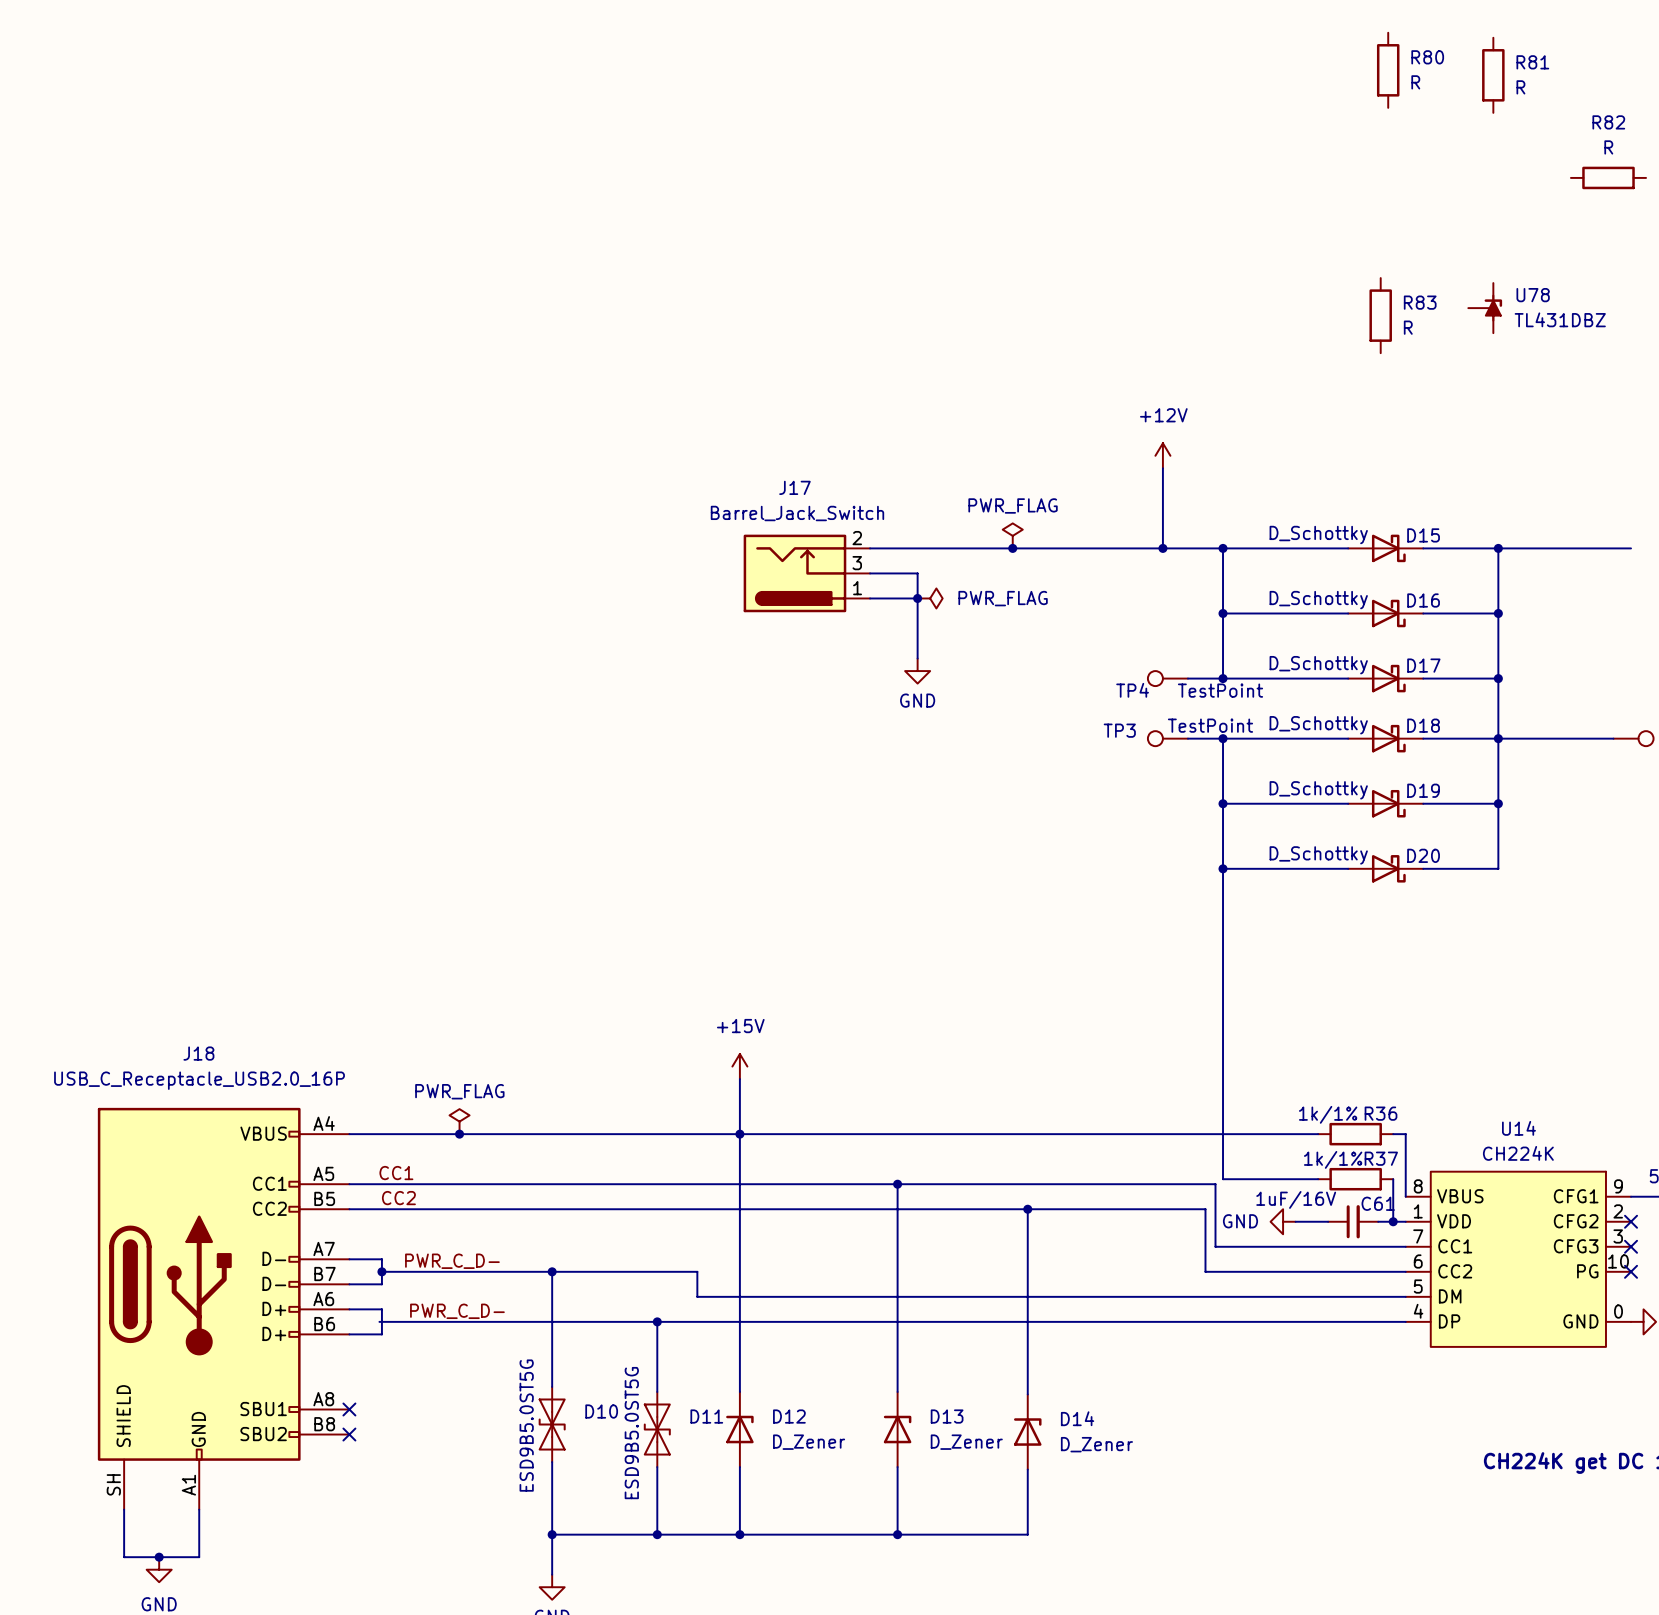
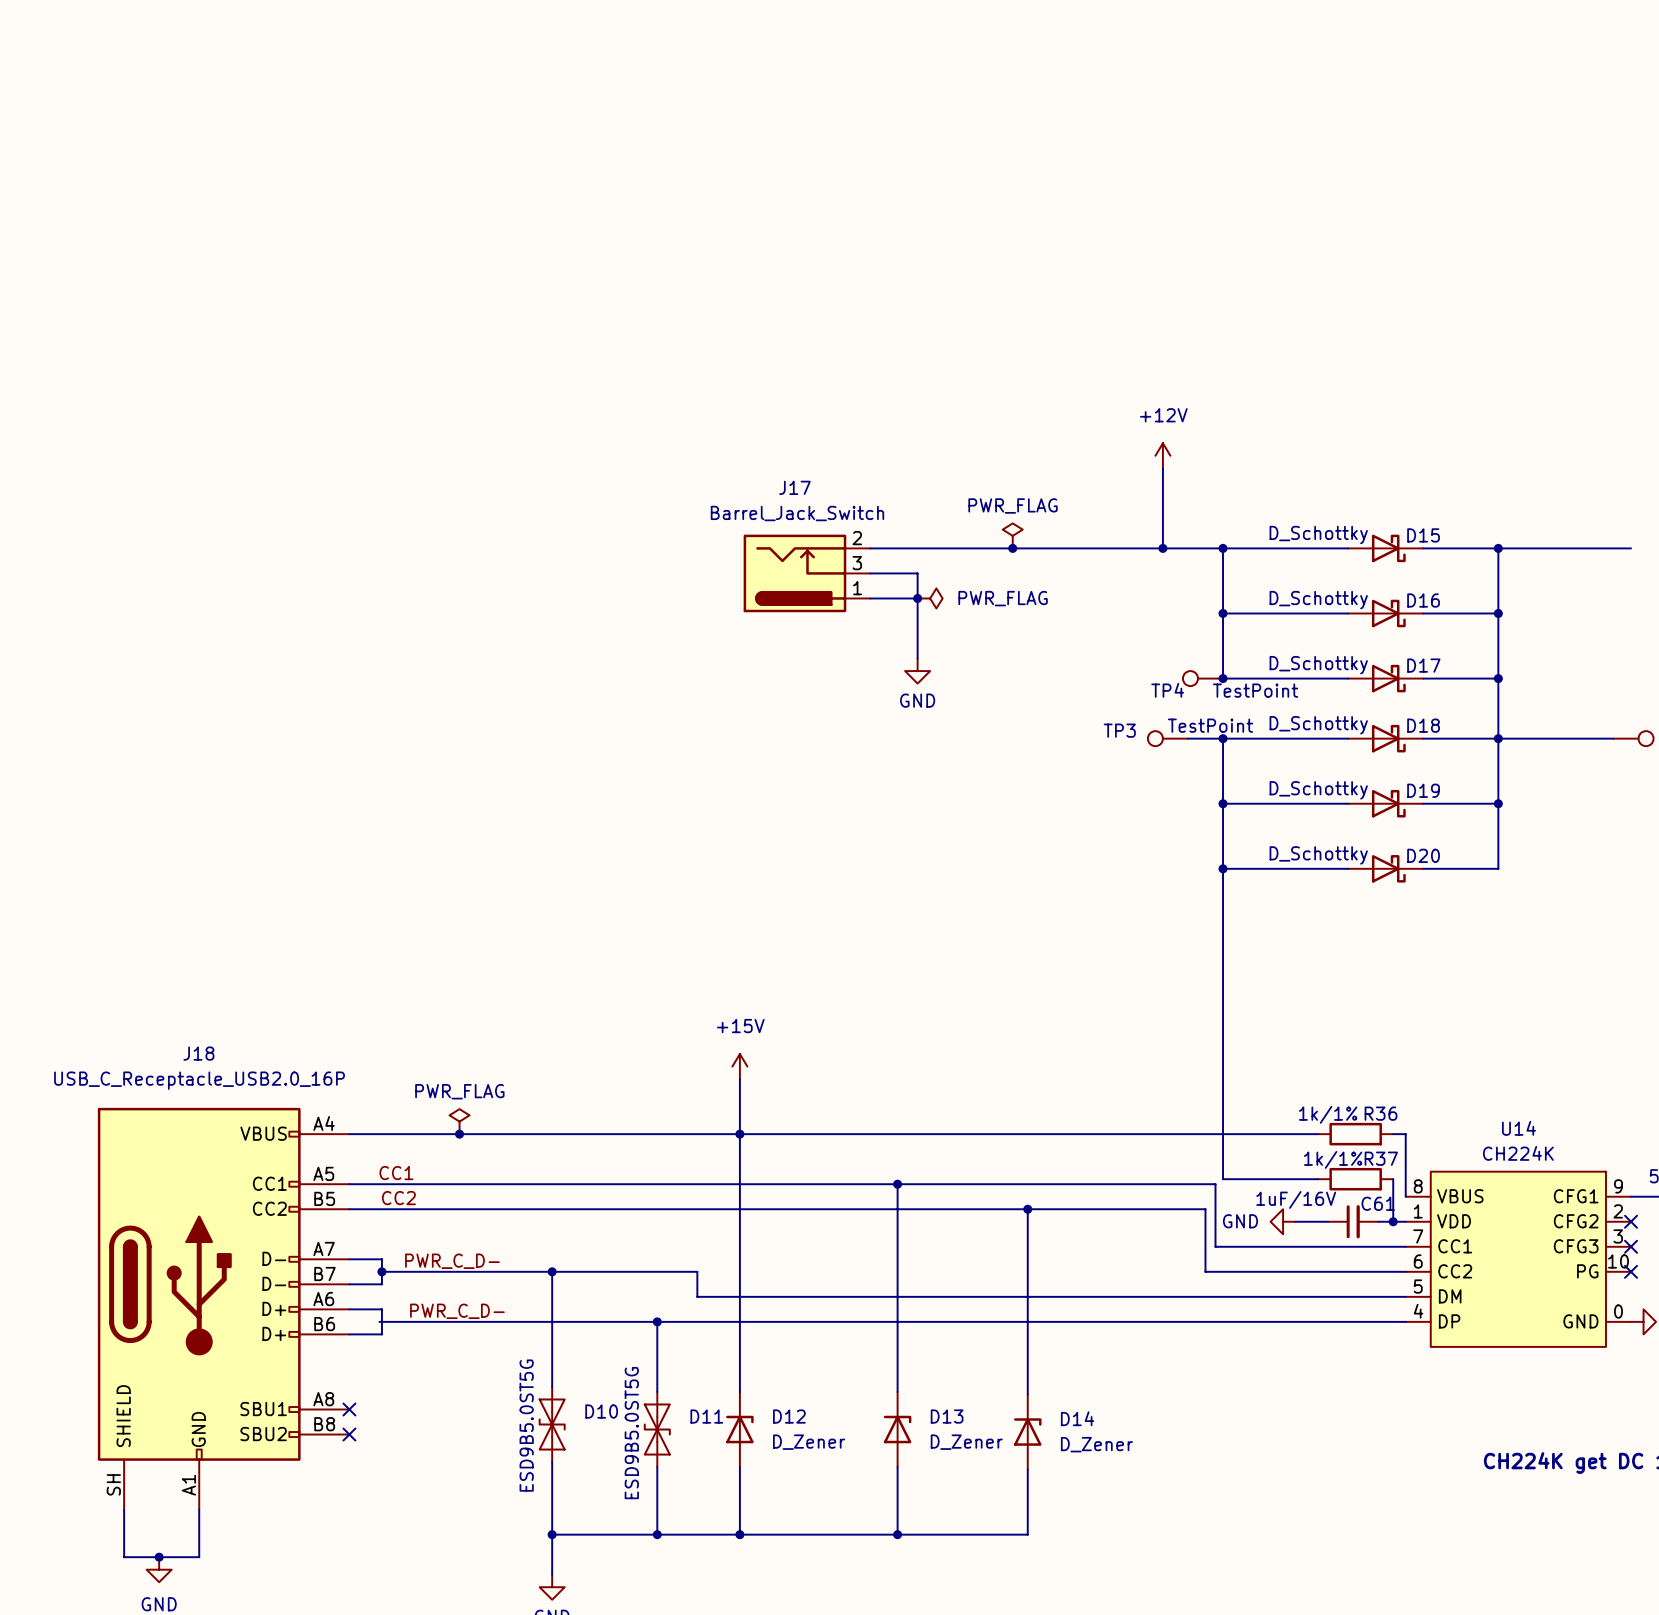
R80: R (1388, 70) -> none
R81: R (1493, 75) -> none
R82: R (1608, 177) -> none
U78: TL431DBZ (1485, 308) -> none
R83: R (1380, 315) -> none
TP4 position: (1167, 678) -> (1202, 678)

